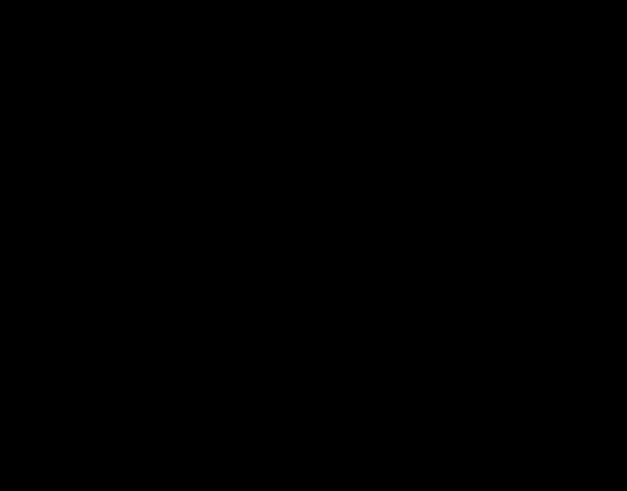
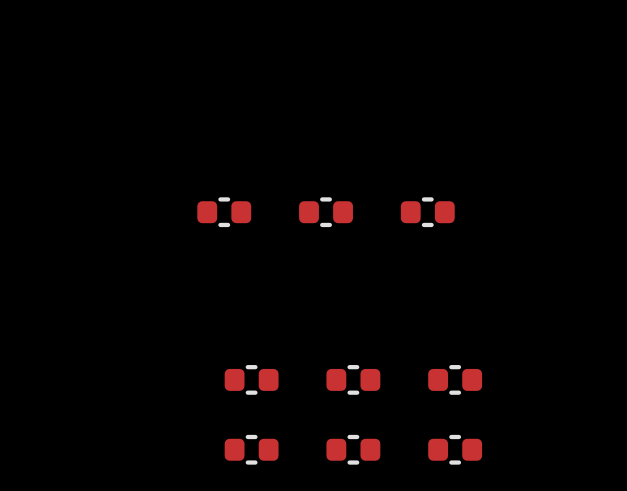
part: none -> (224, 212)
part: none -> (326, 212)
part: none -> (427, 212)
part: none -> (251, 379)
part: none -> (353, 379)
part: none -> (455, 379)
part: none -> (251, 449)
part: none -> (353, 449)
part: none -> (455, 449)

